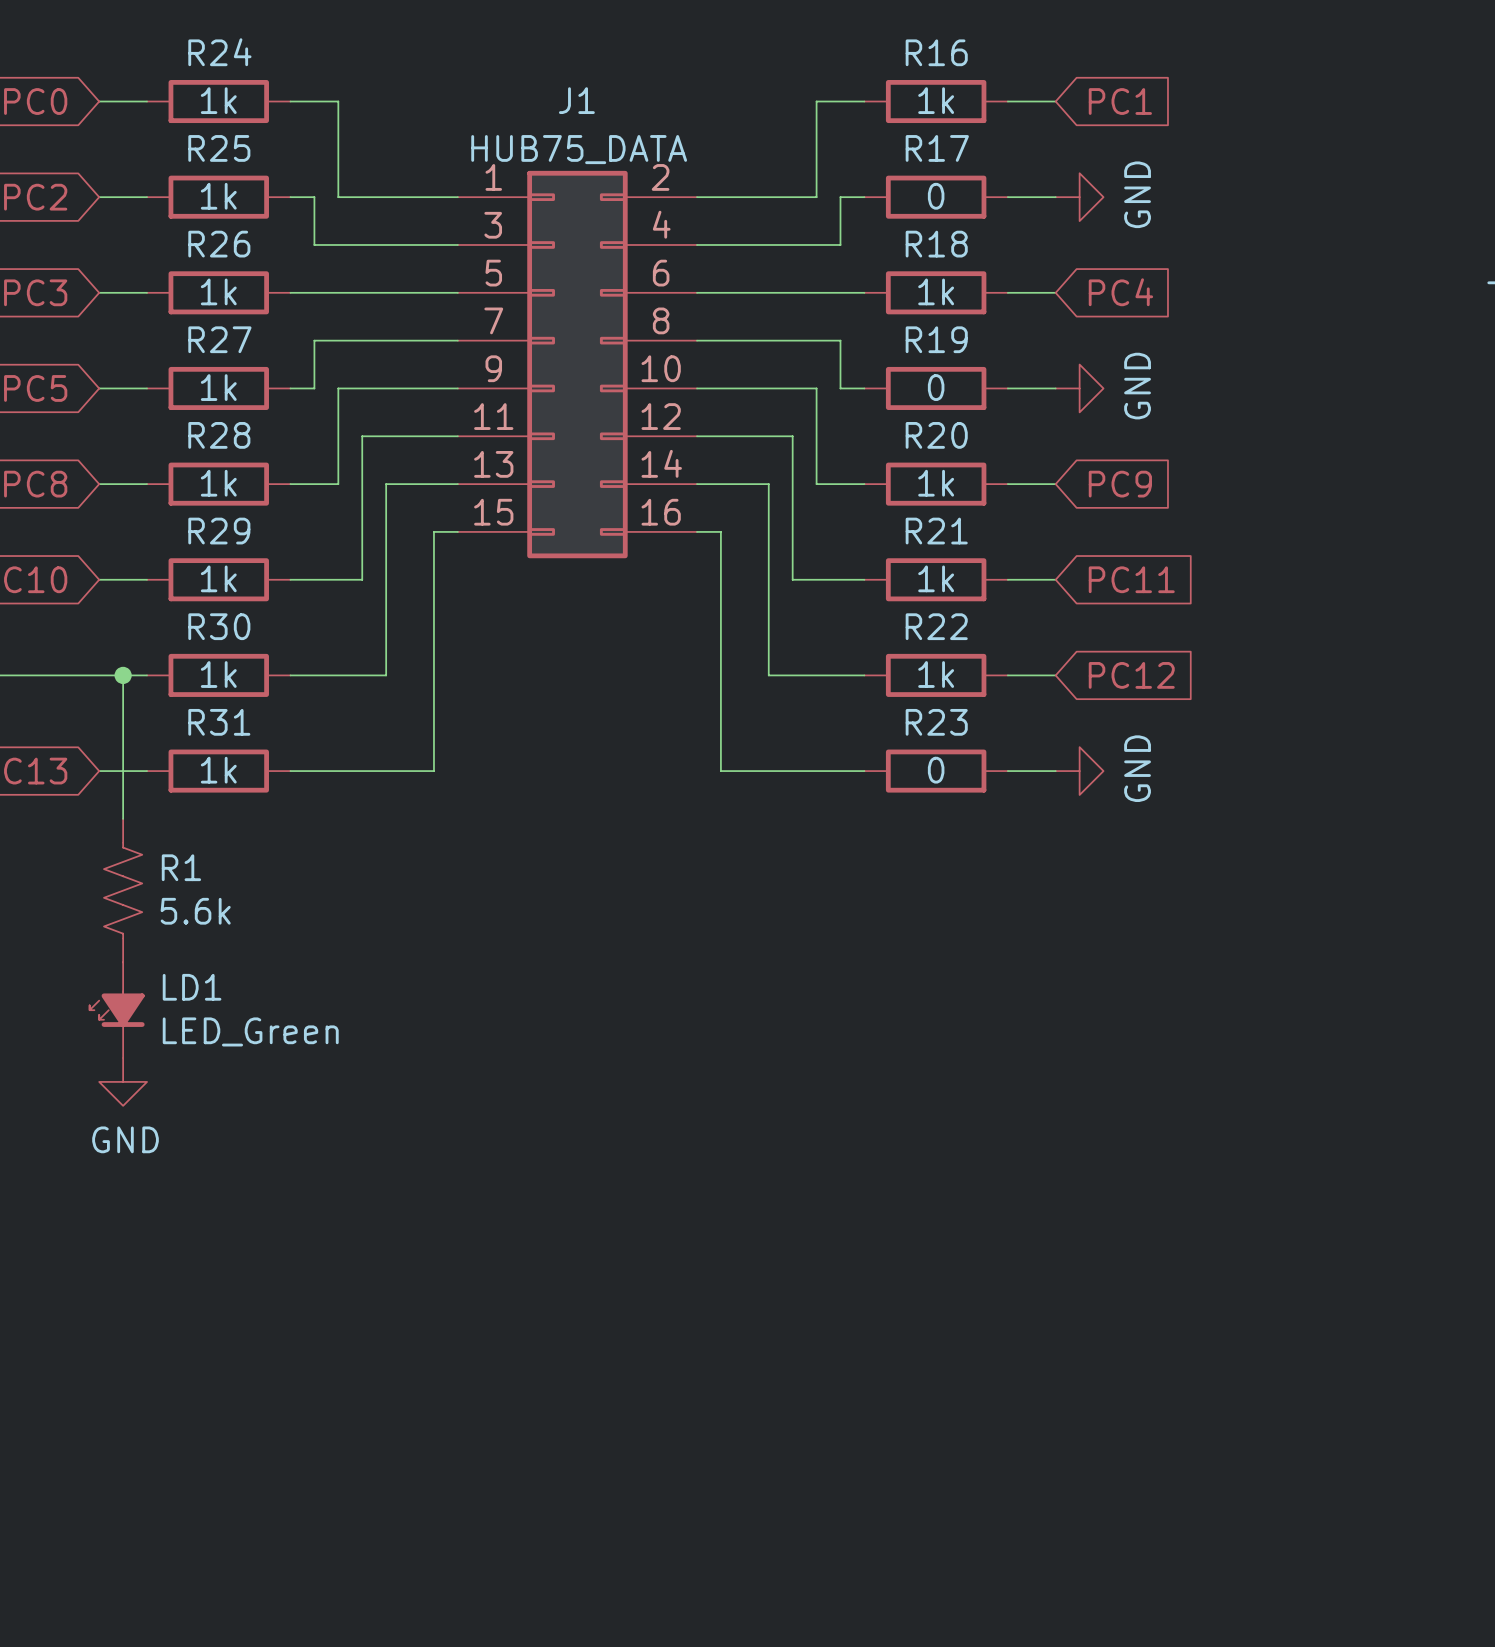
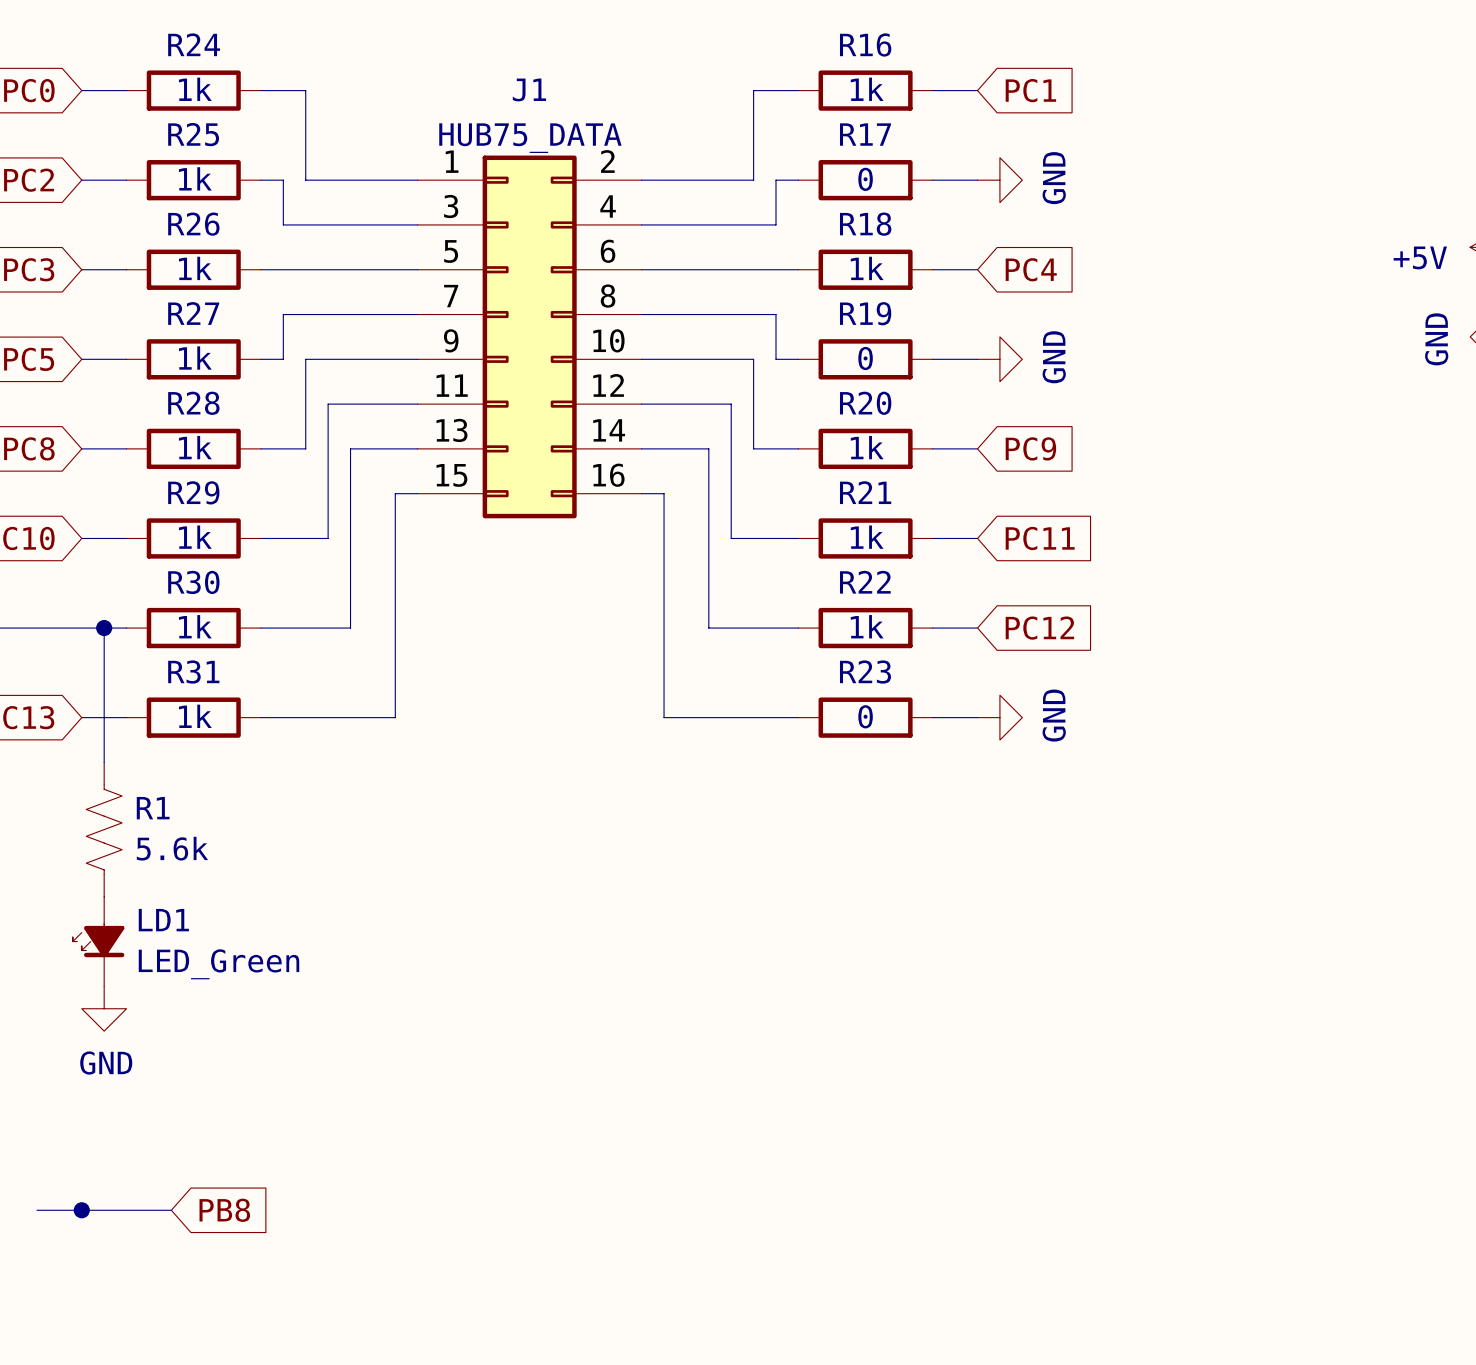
wire: none -> (37, 1210) (171, 1210)
junction: none -> (81, 1210)
global label: none -> PB8 (224, 1210)

